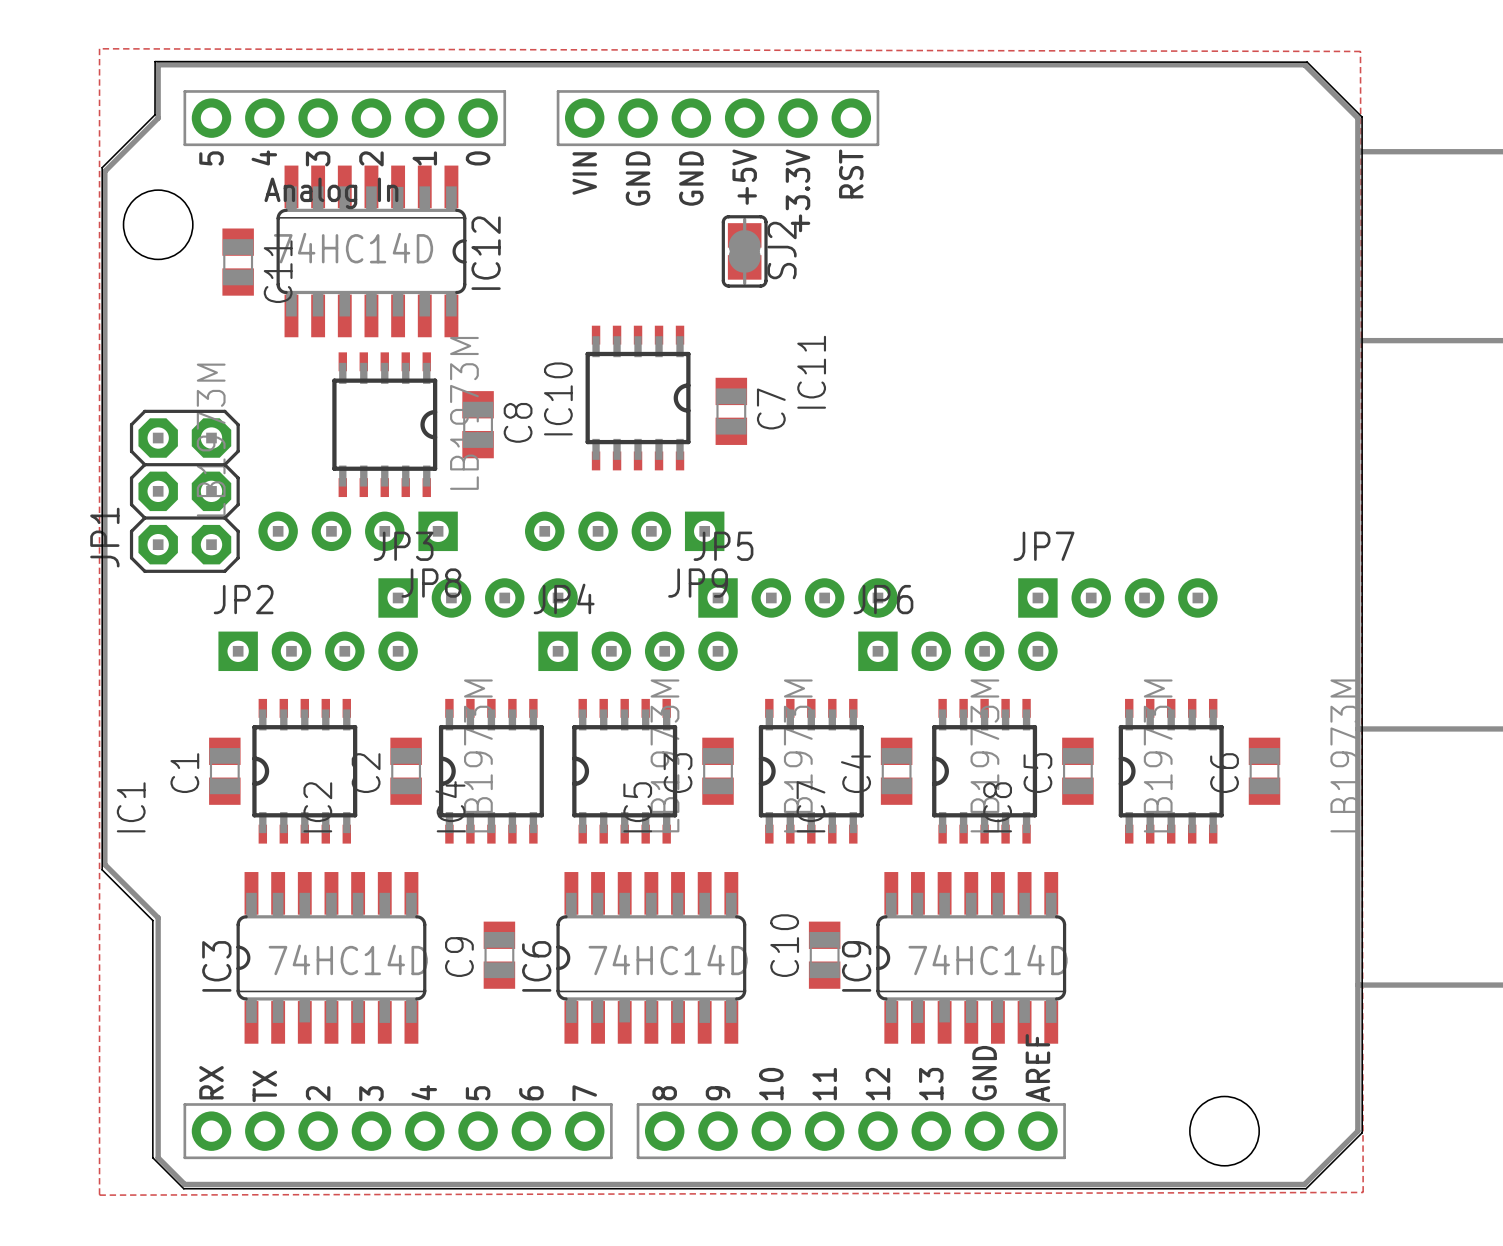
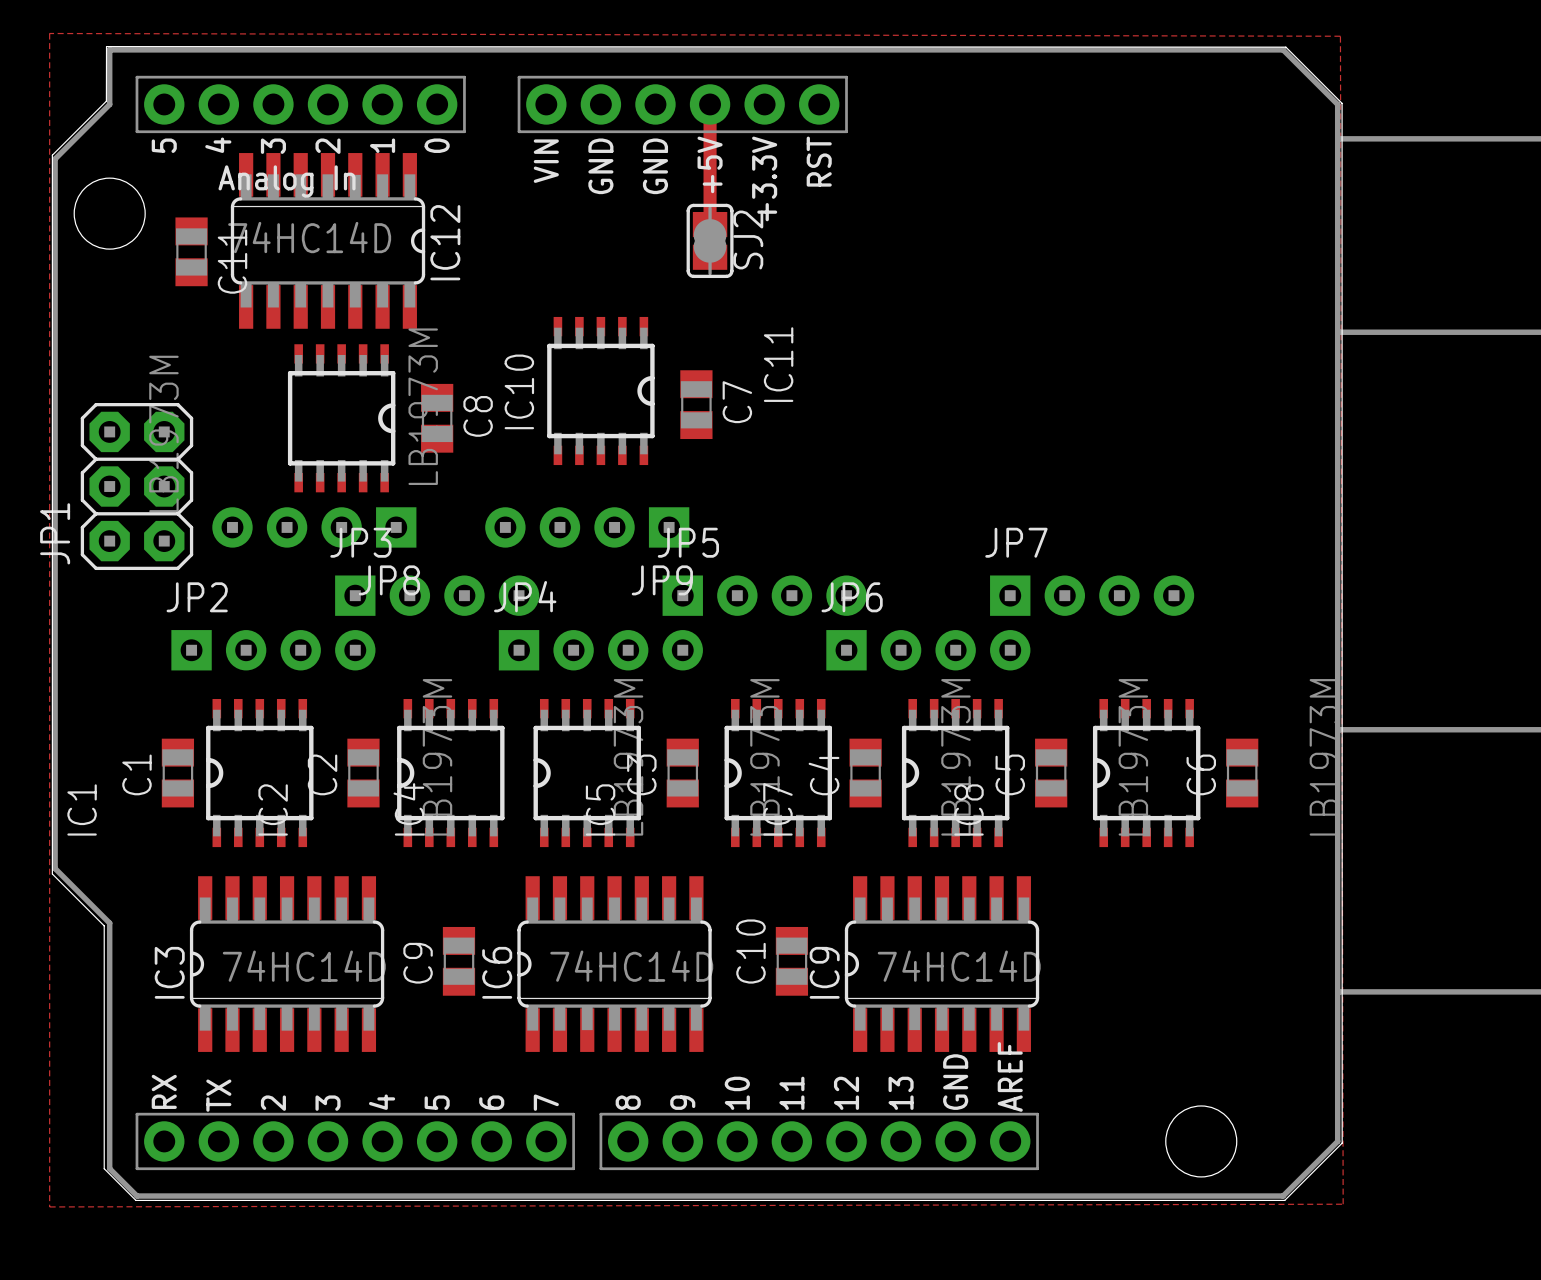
track: none -> (710, 104) (710, 224)

